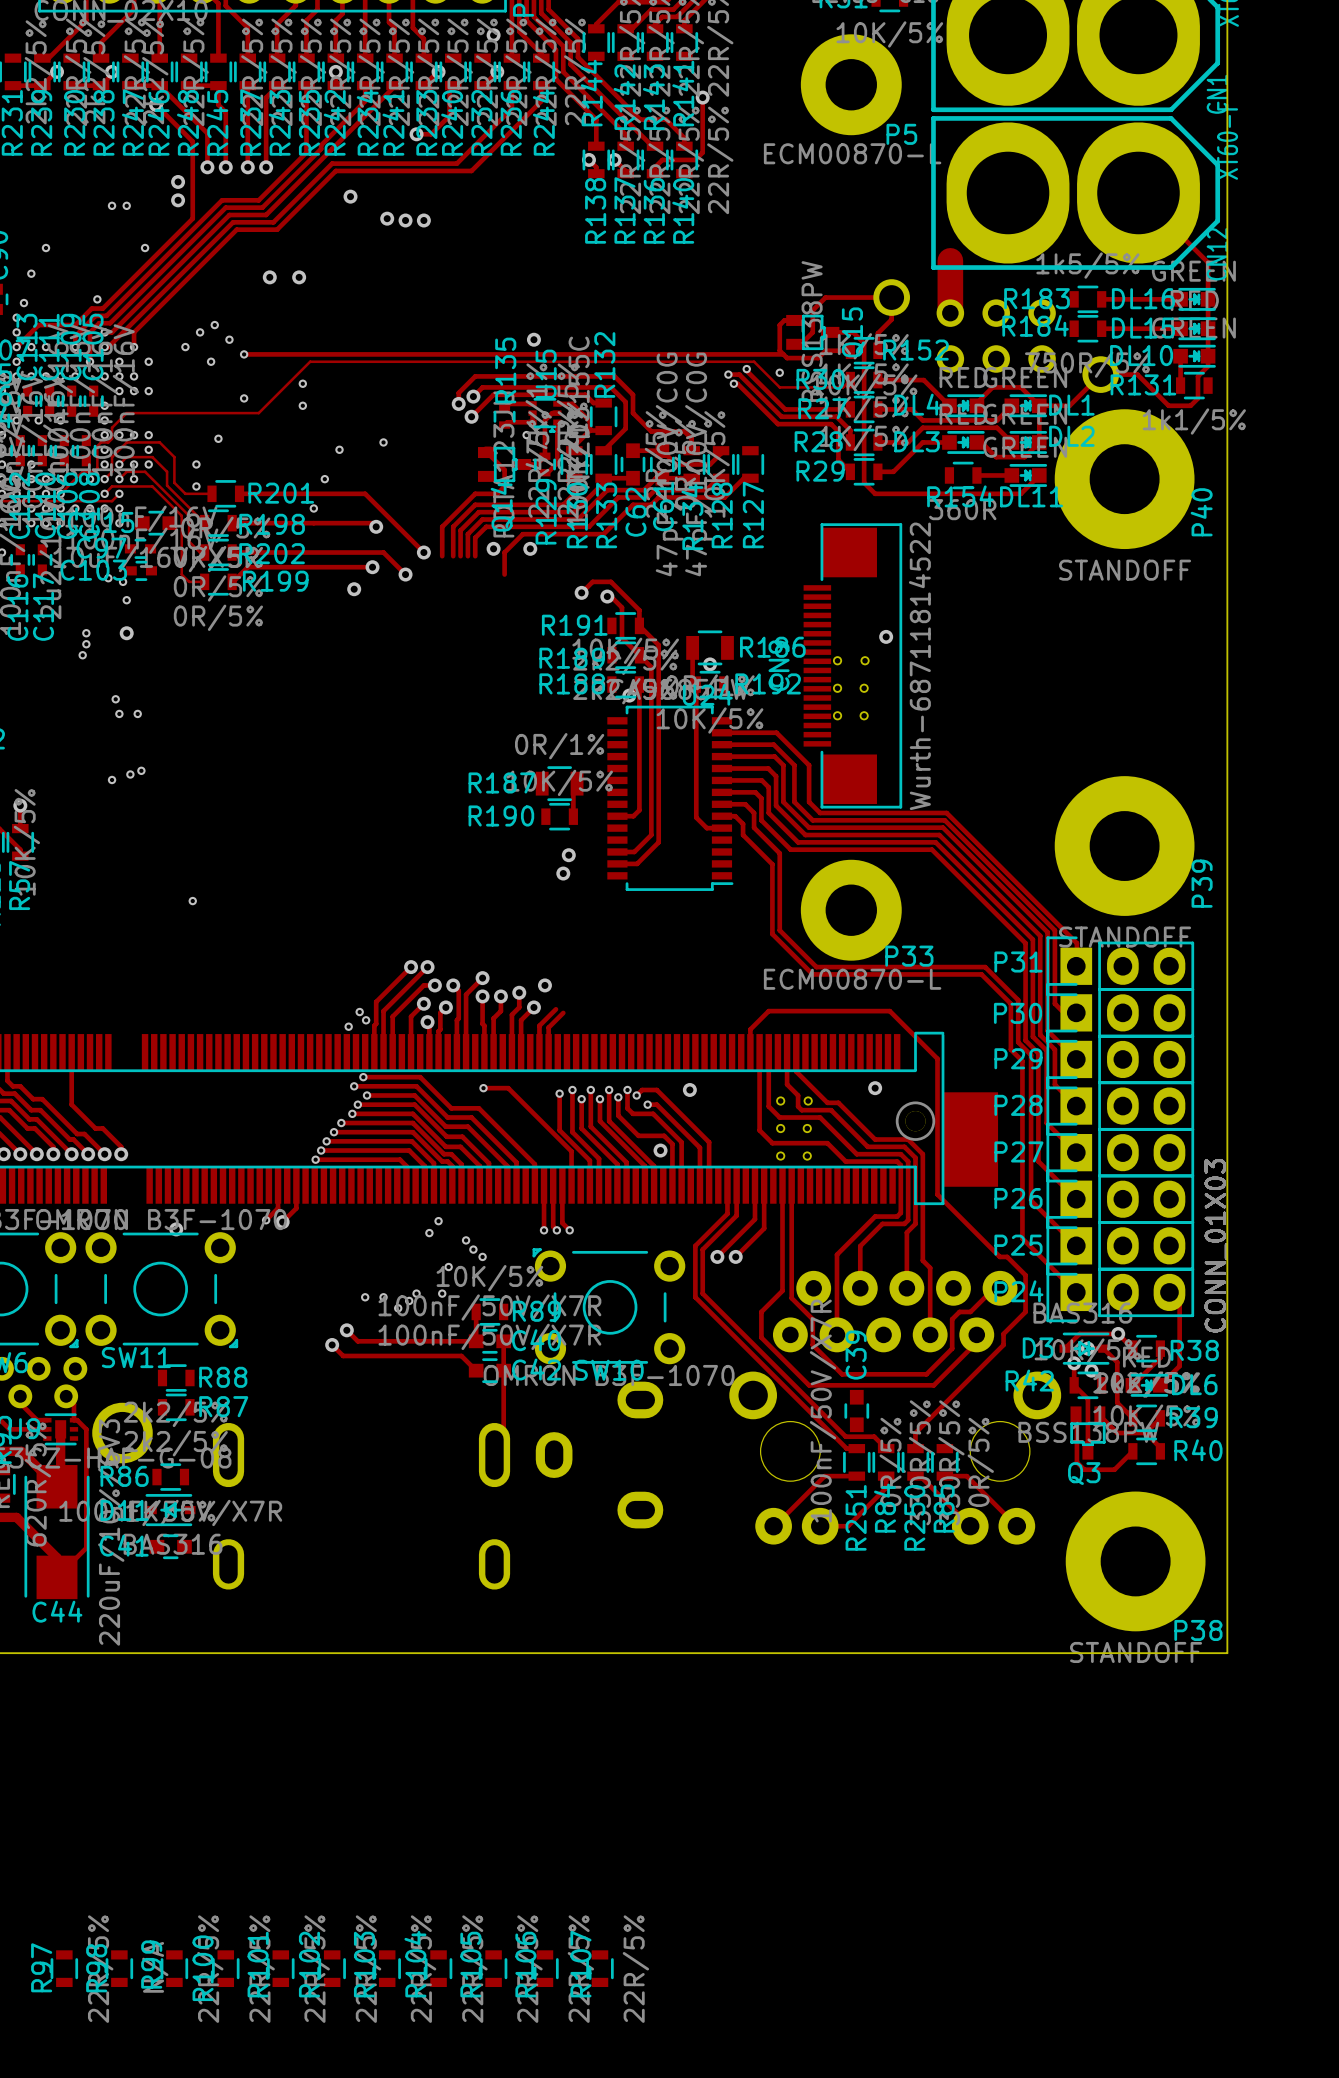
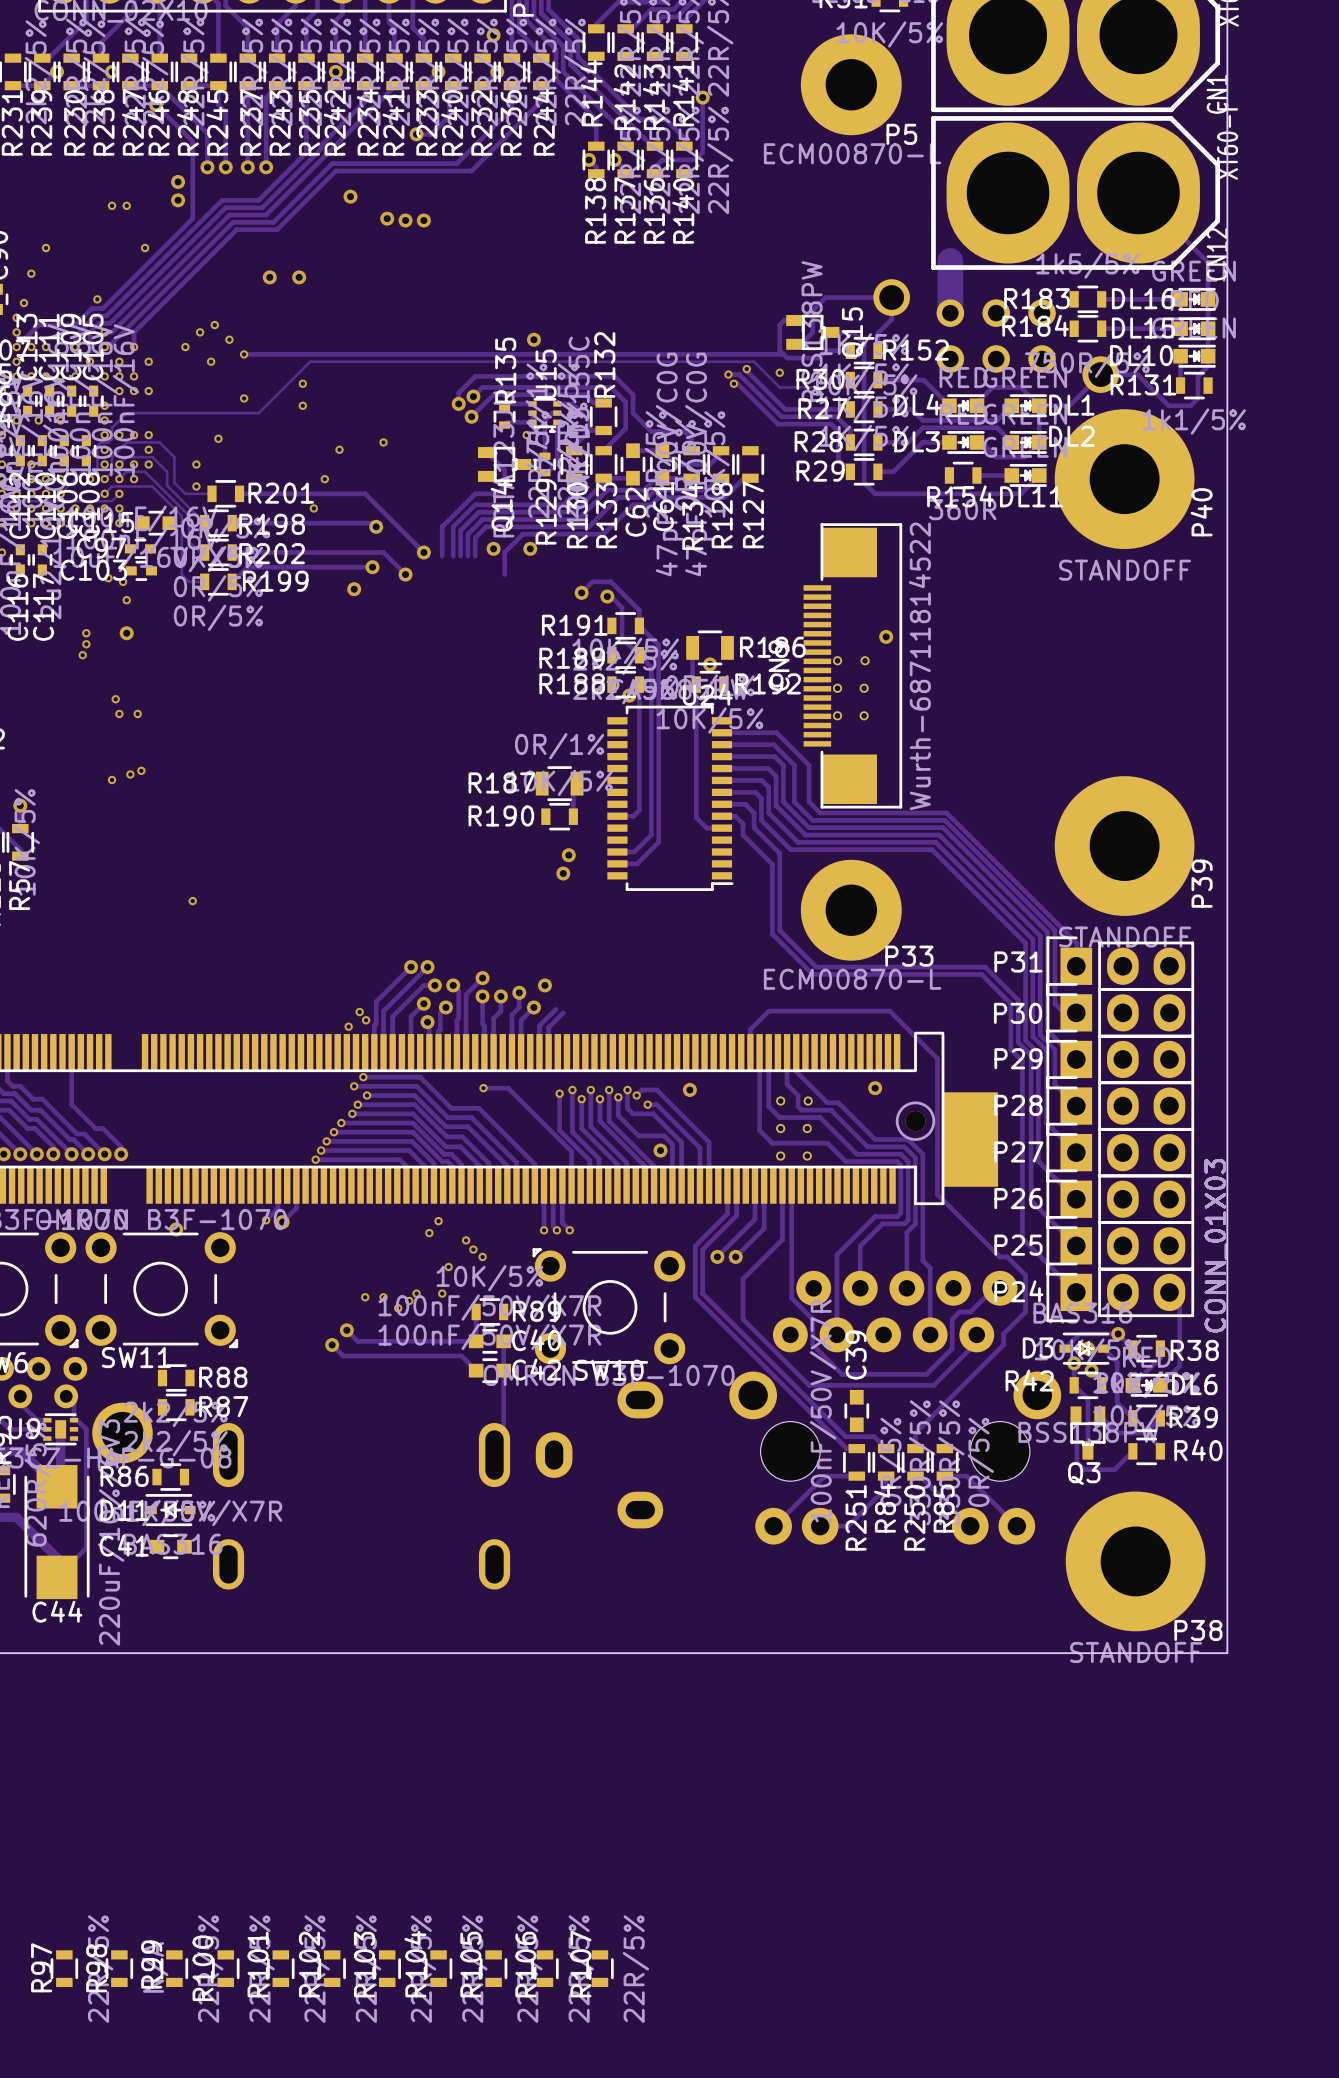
track: (782, 1239) (782, 1290) (761, 1311) (761, 1337) -> (782, 1239) (743, 1278) (743, 1319) (761, 1337)

